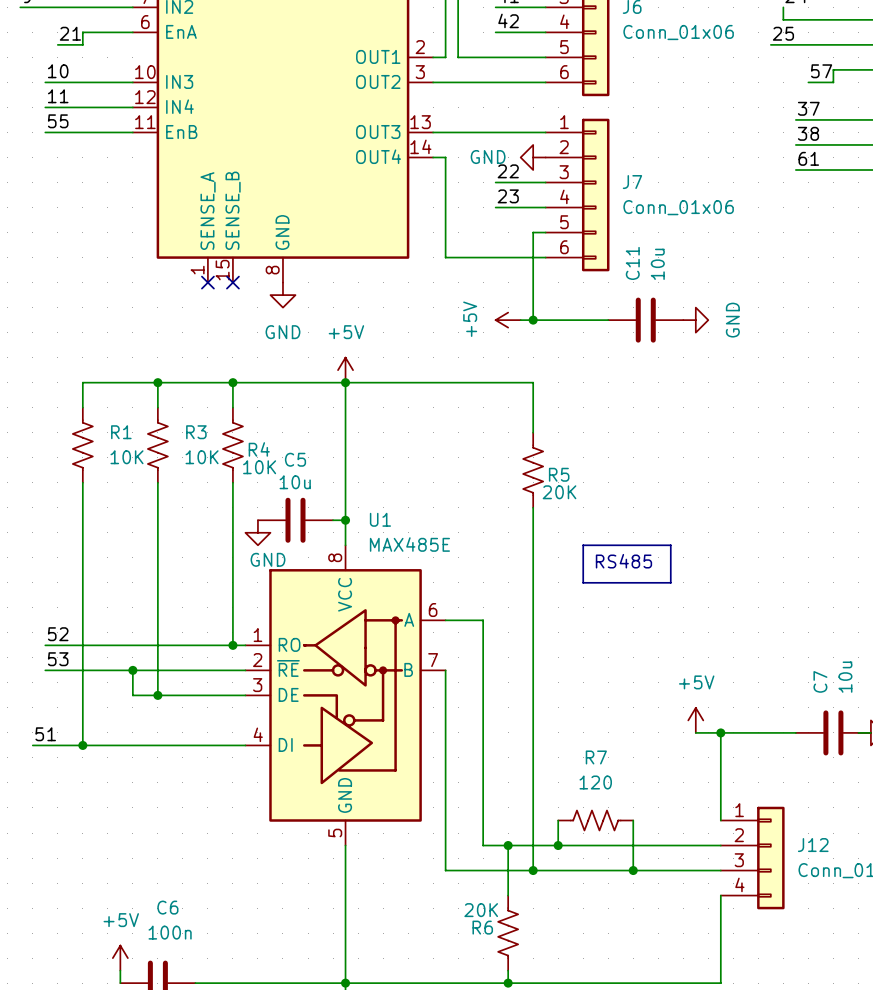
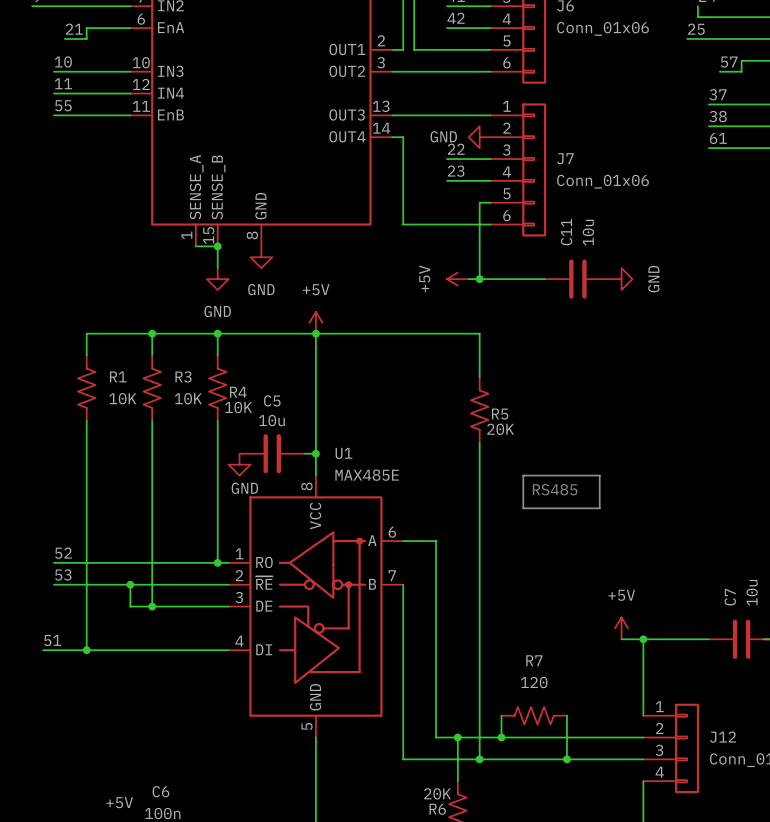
wire: none -> (195, 246) (217, 246) (217, 268)
no-connect mark: (207, 282) -> none
no-connect mark: (232, 282) -> none
junction: none -> (217, 246)
power symbol: none -> GND (217, 279)

